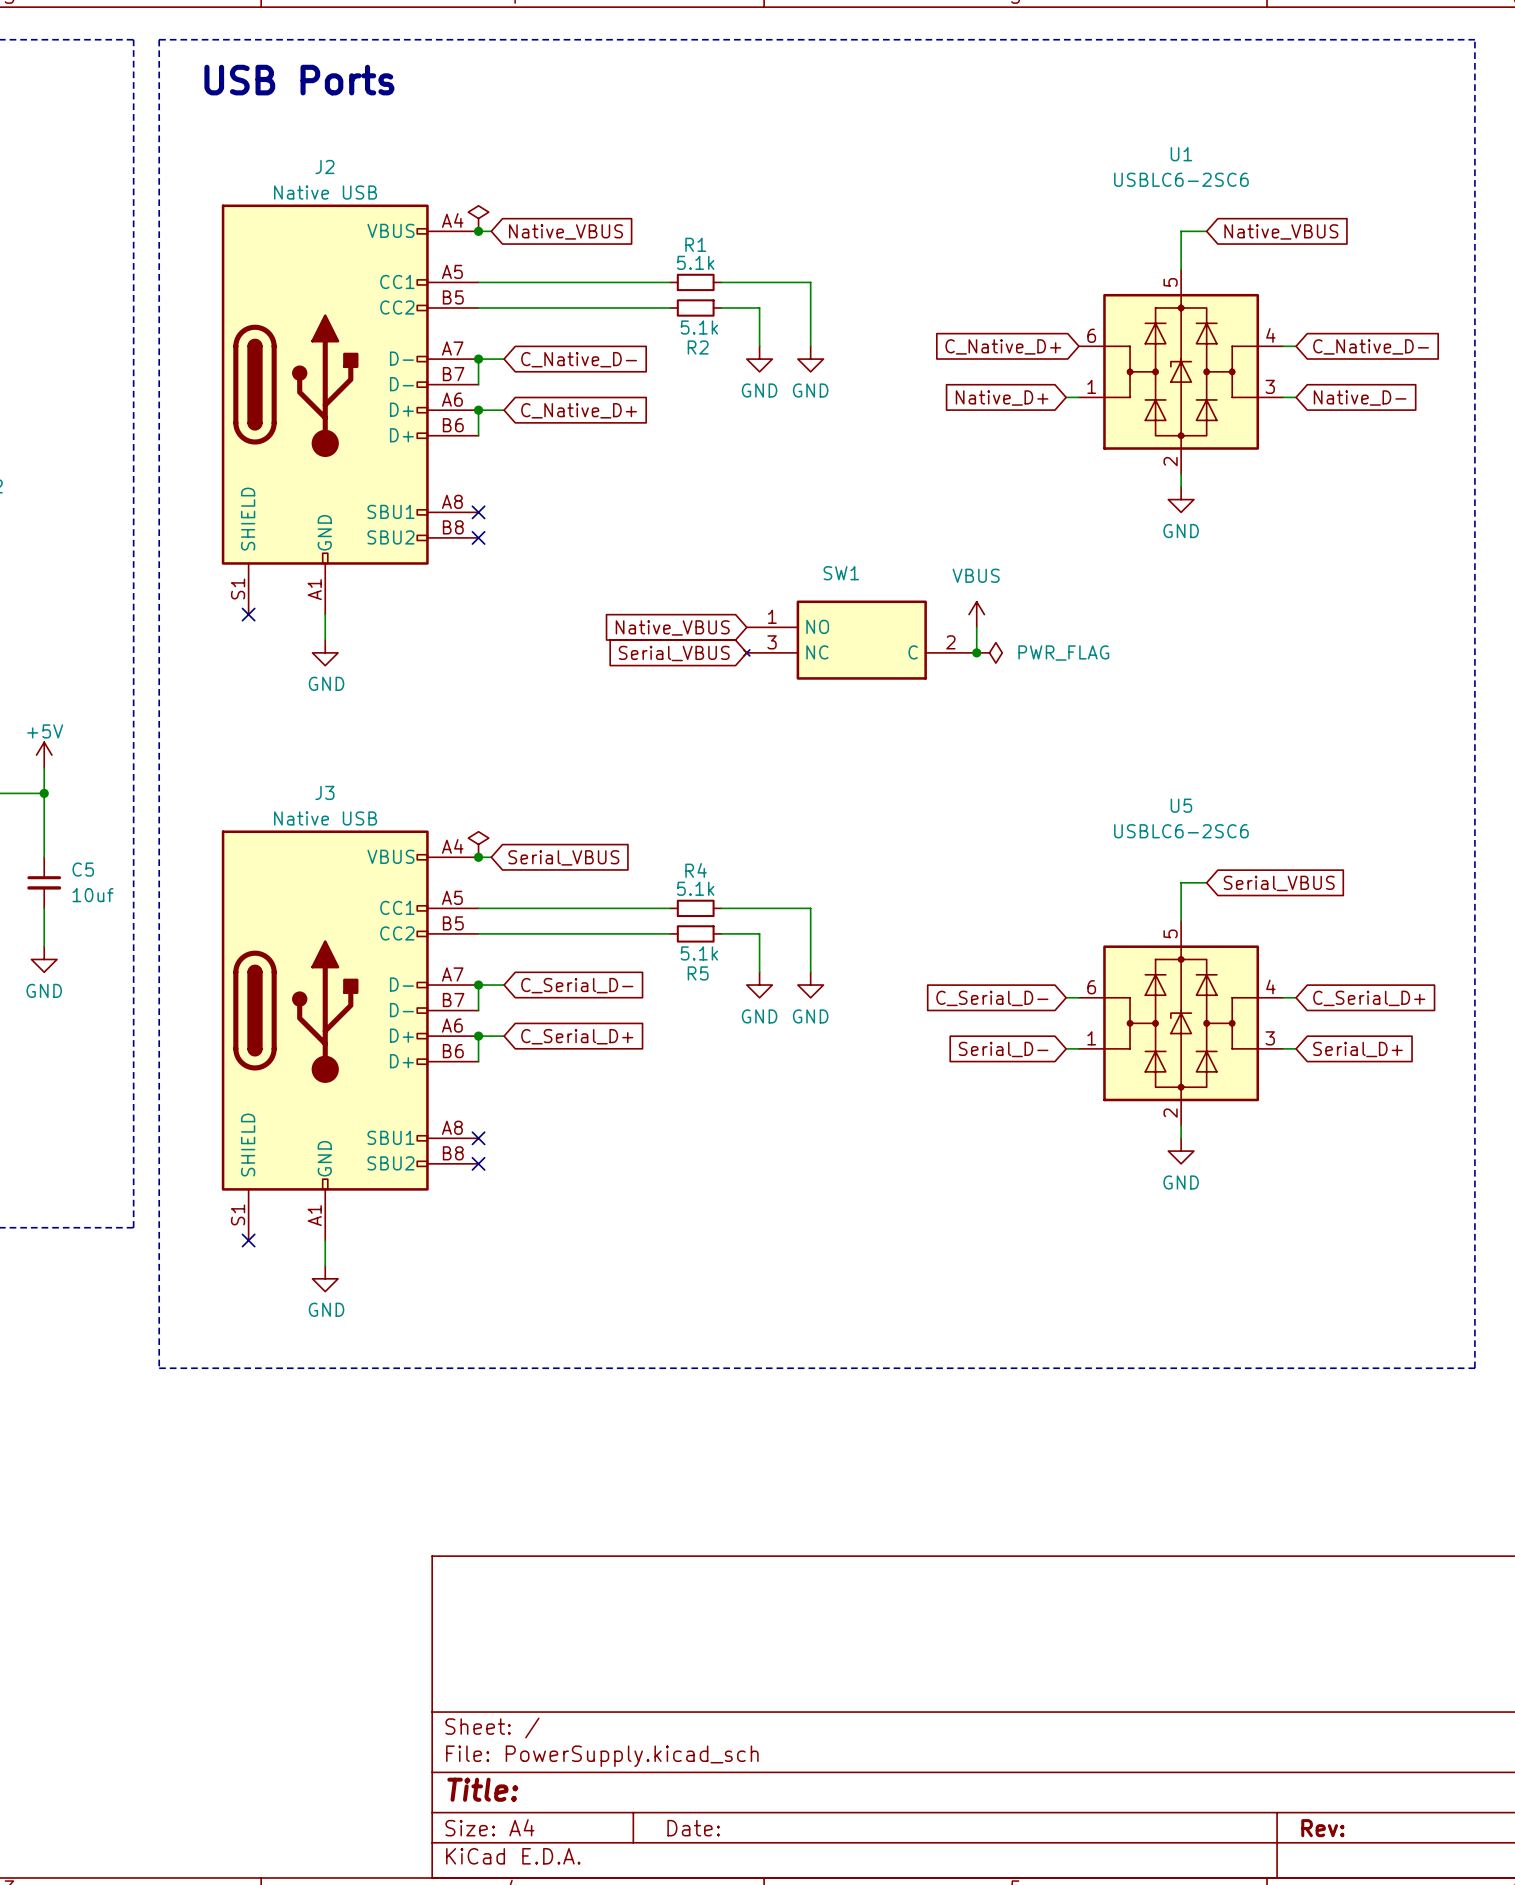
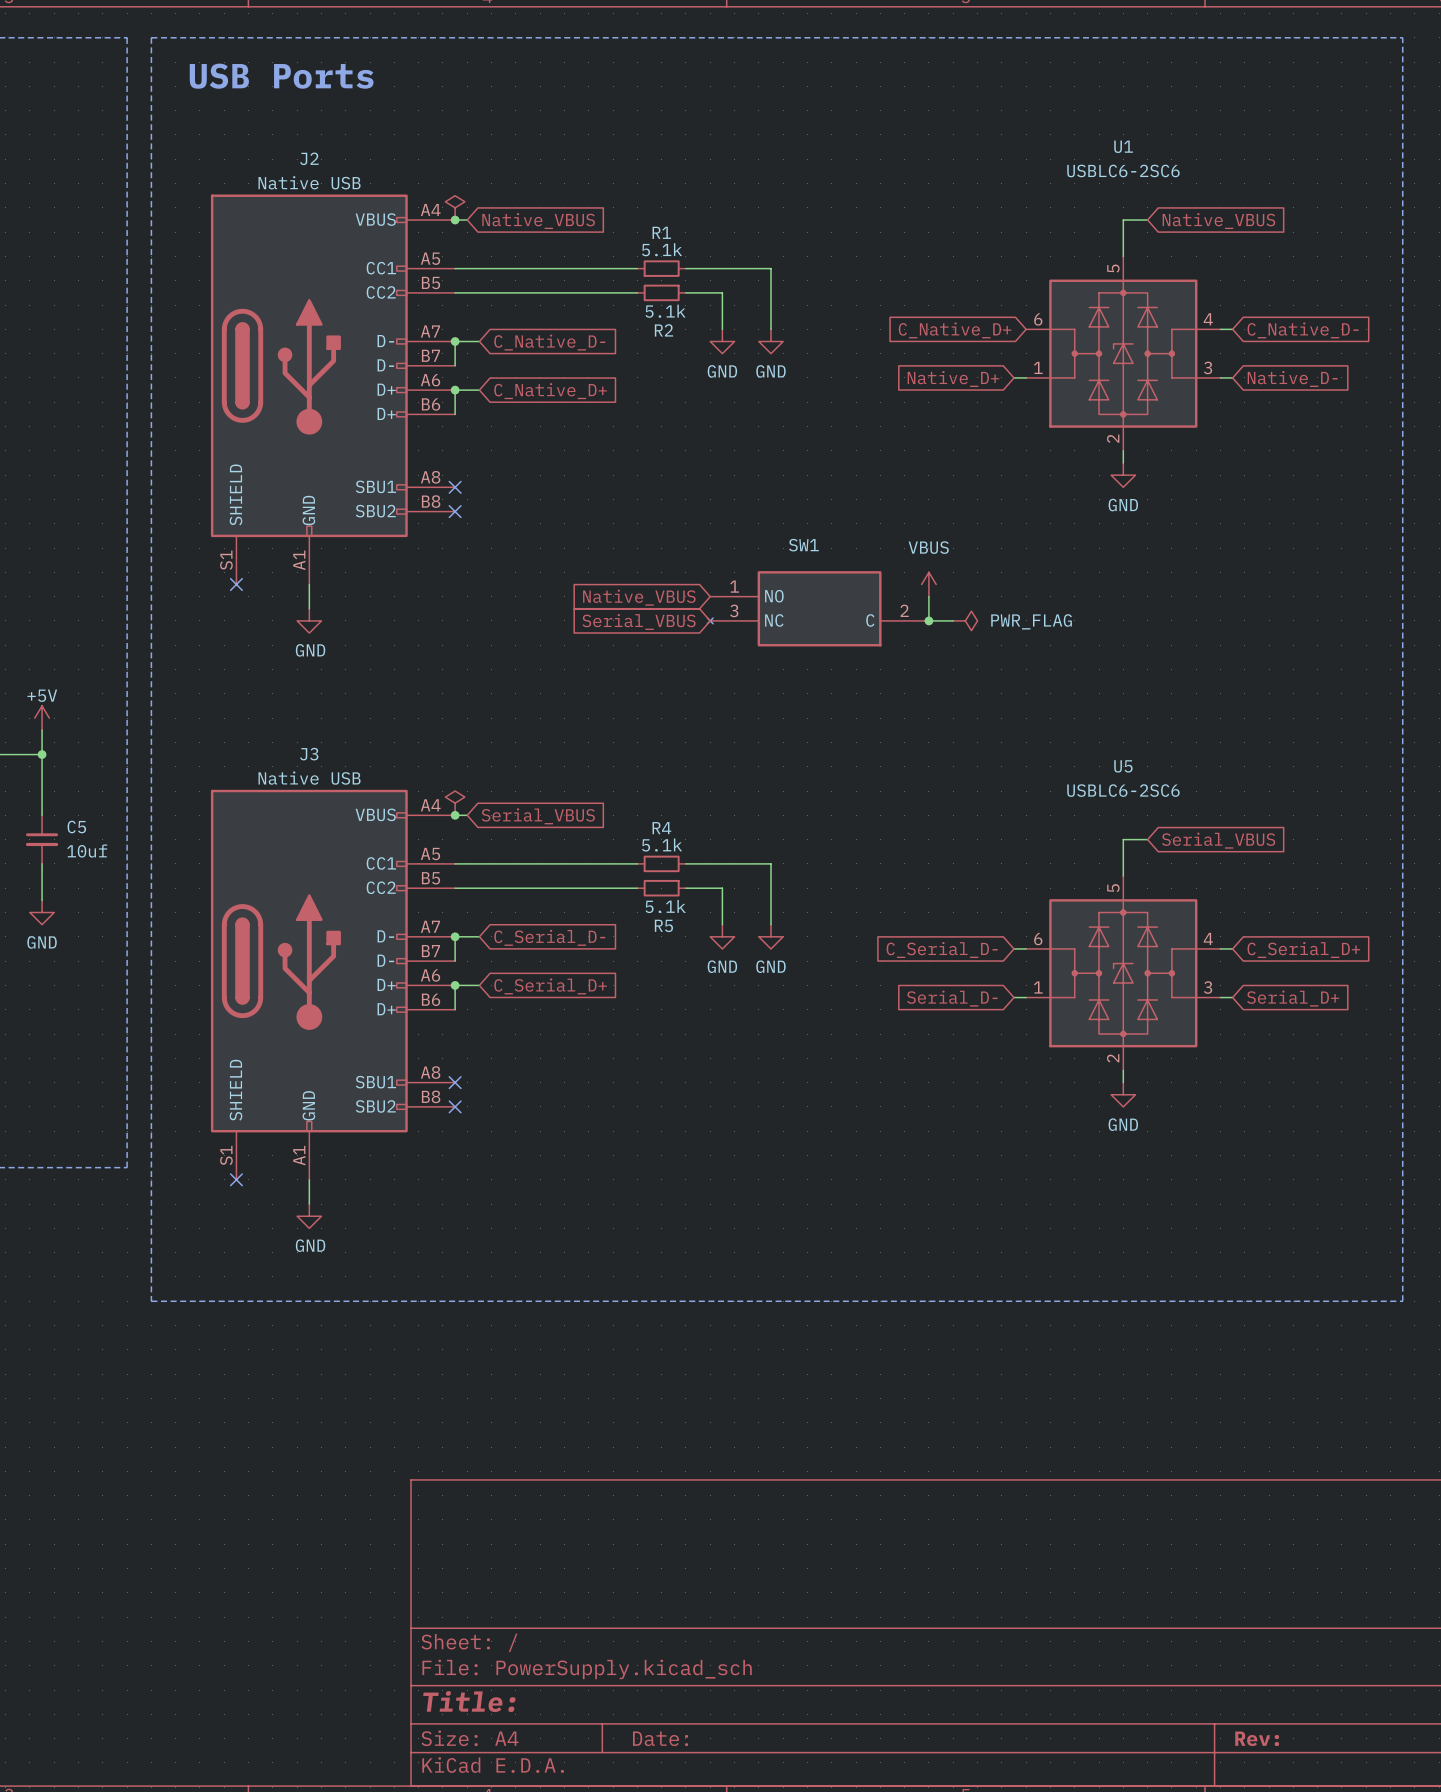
power symbol position: PWR_FLAG (989, 652) -> PWR_FLAG (965, 620)

